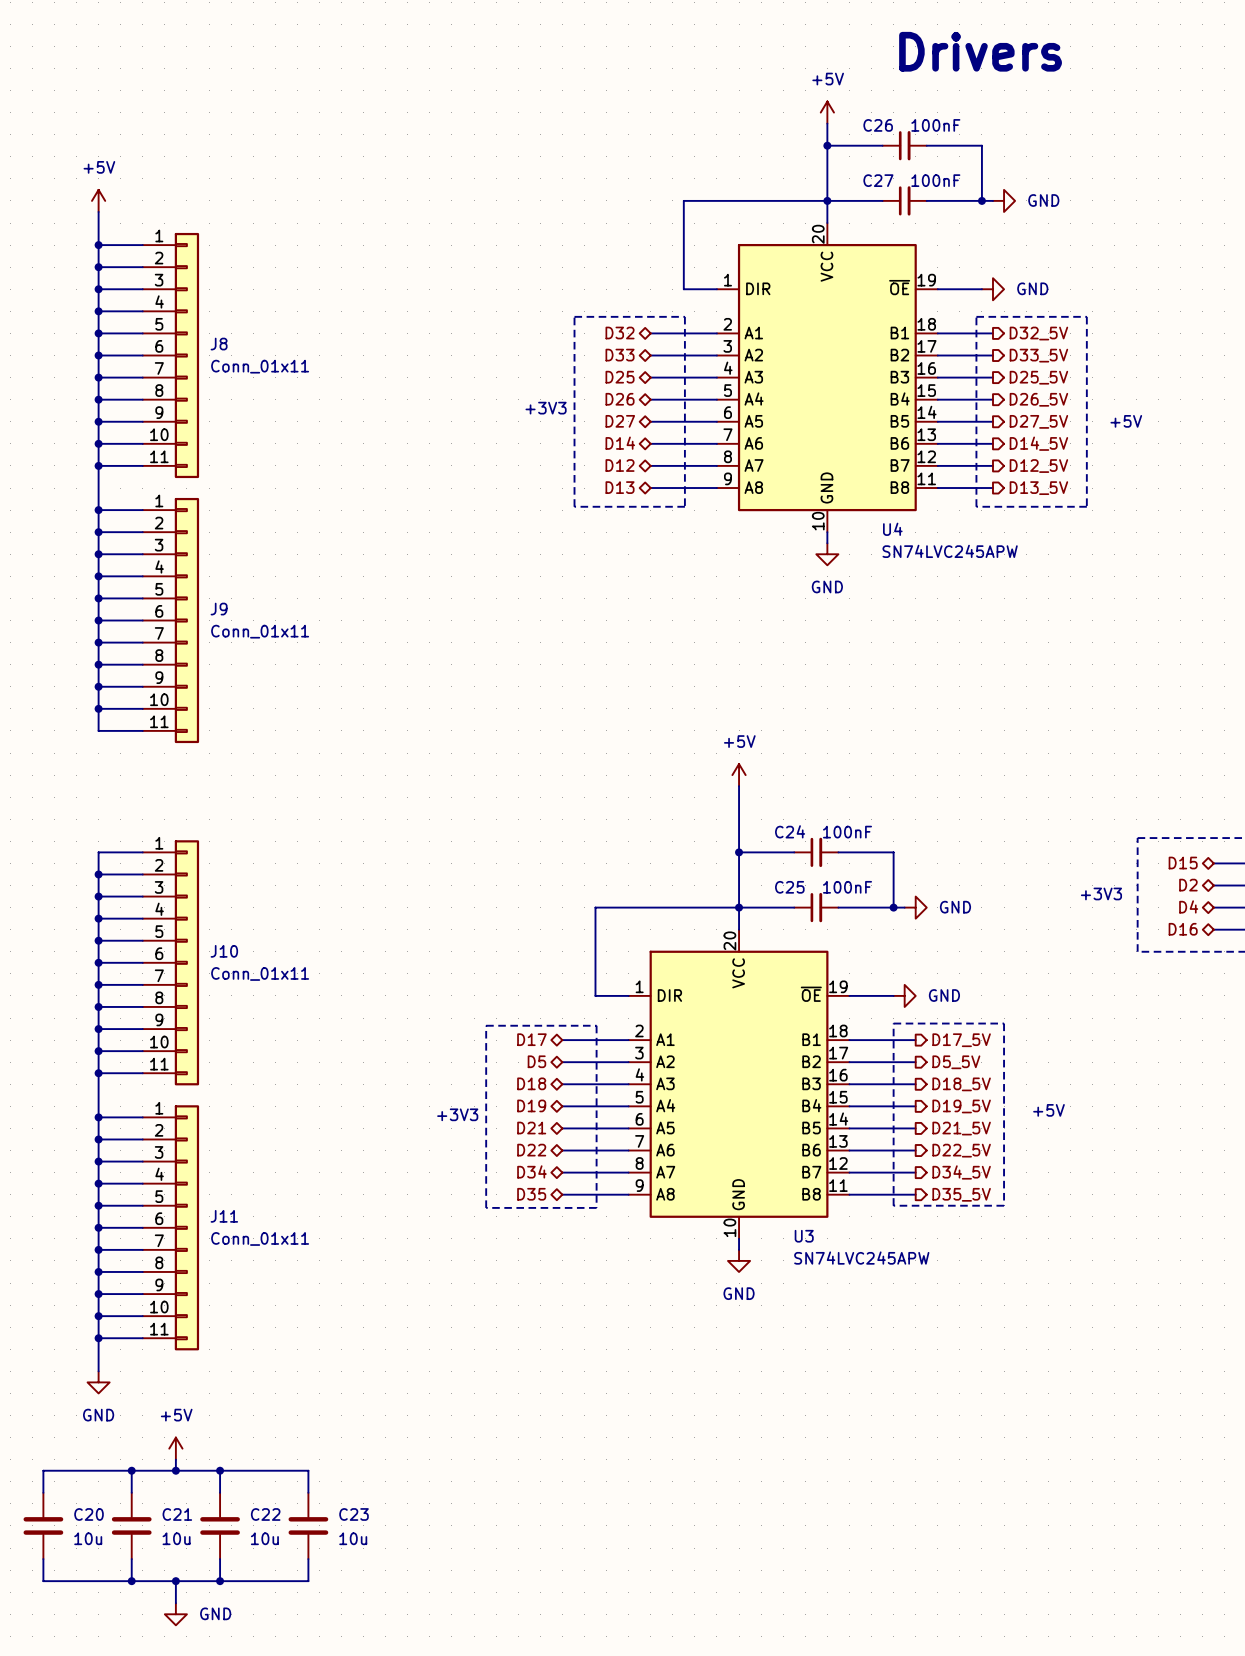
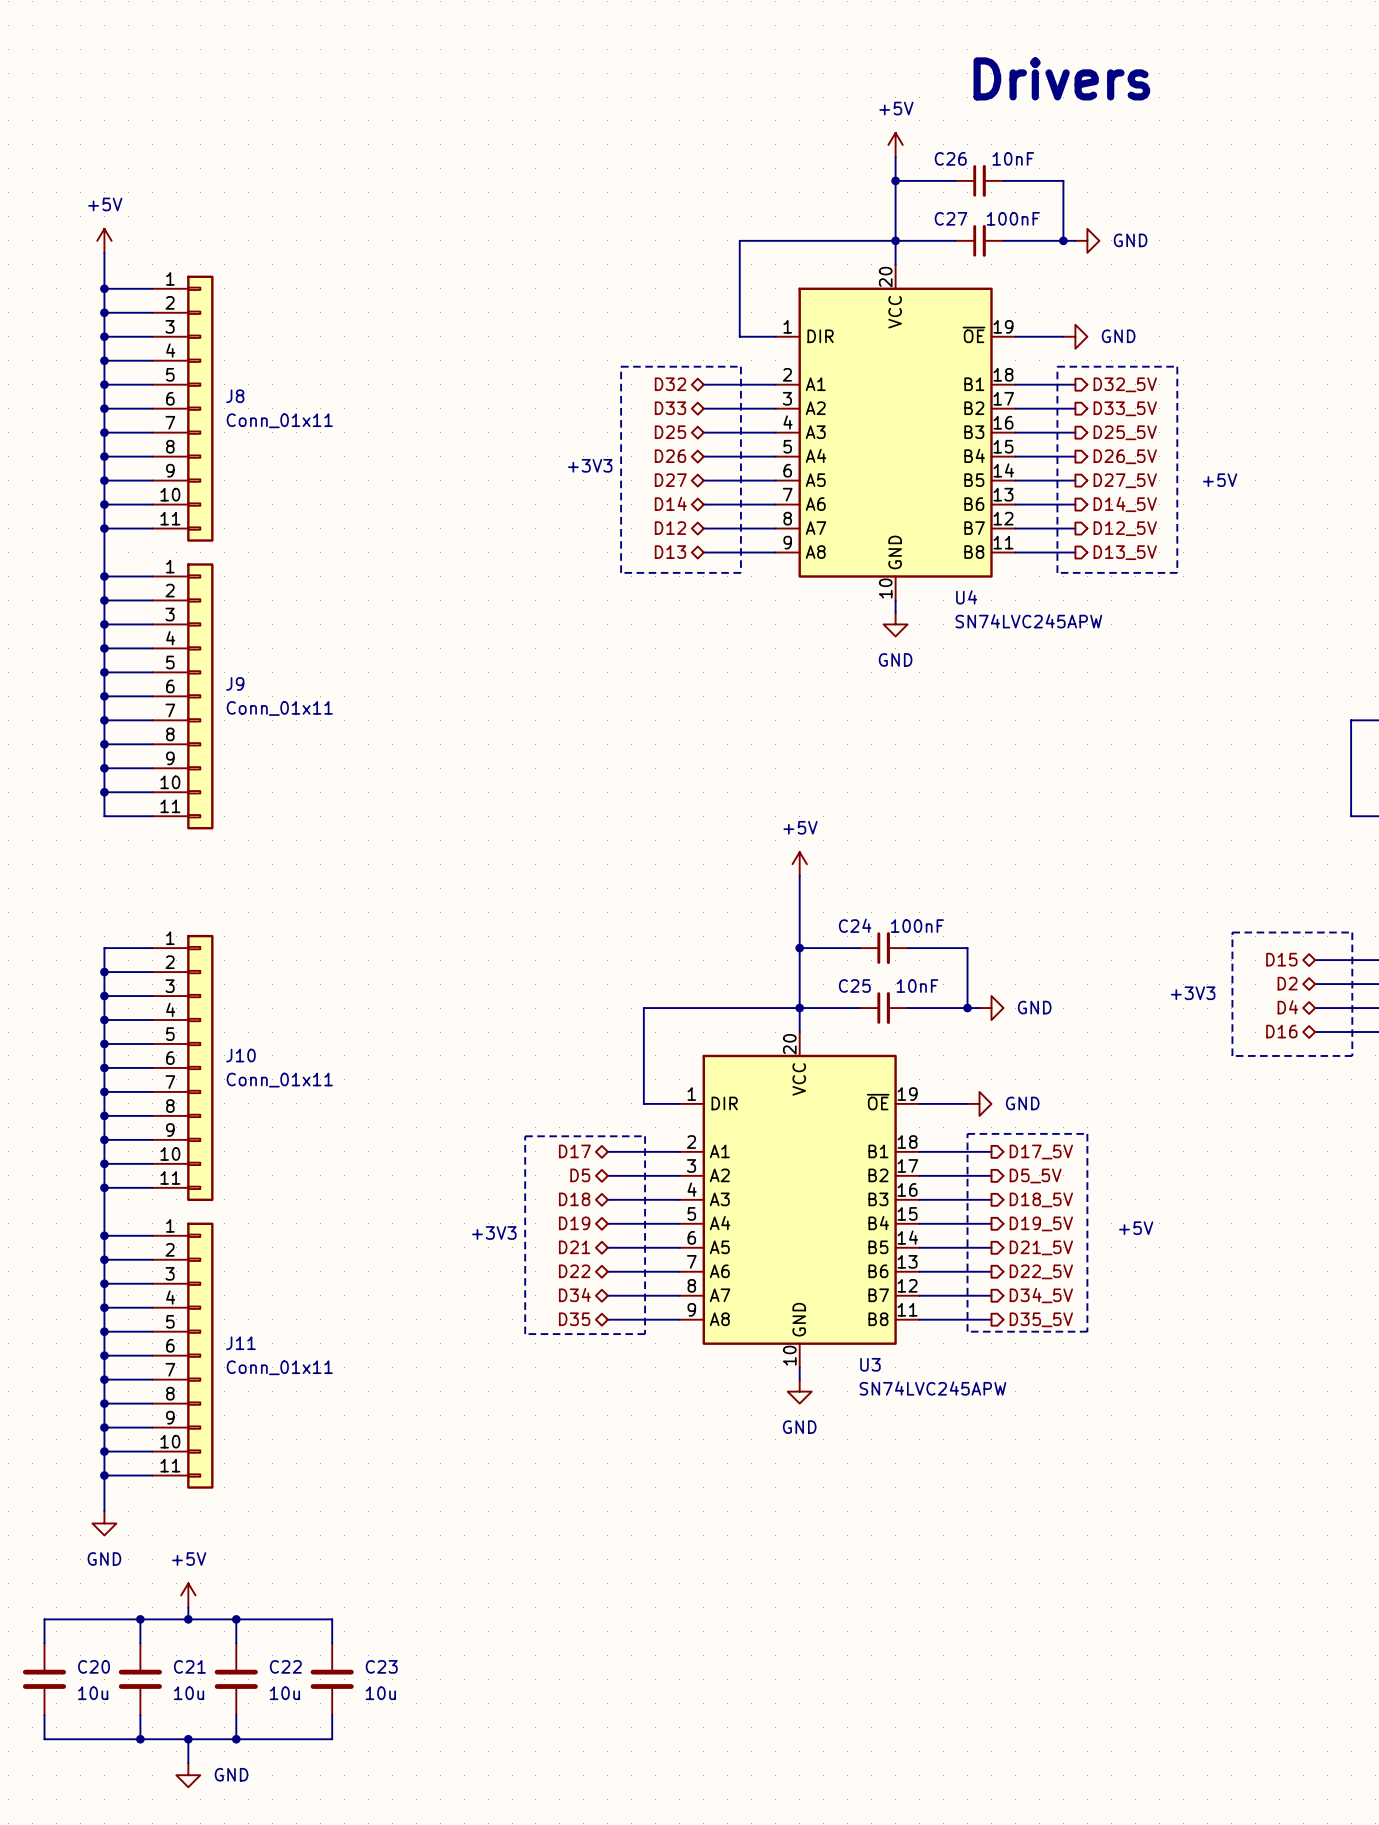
C26 value: 100nF (935, 125) -> 10nF (1013, 158)
C25 value: 100nF (847, 887) -> 10nF (917, 986)

